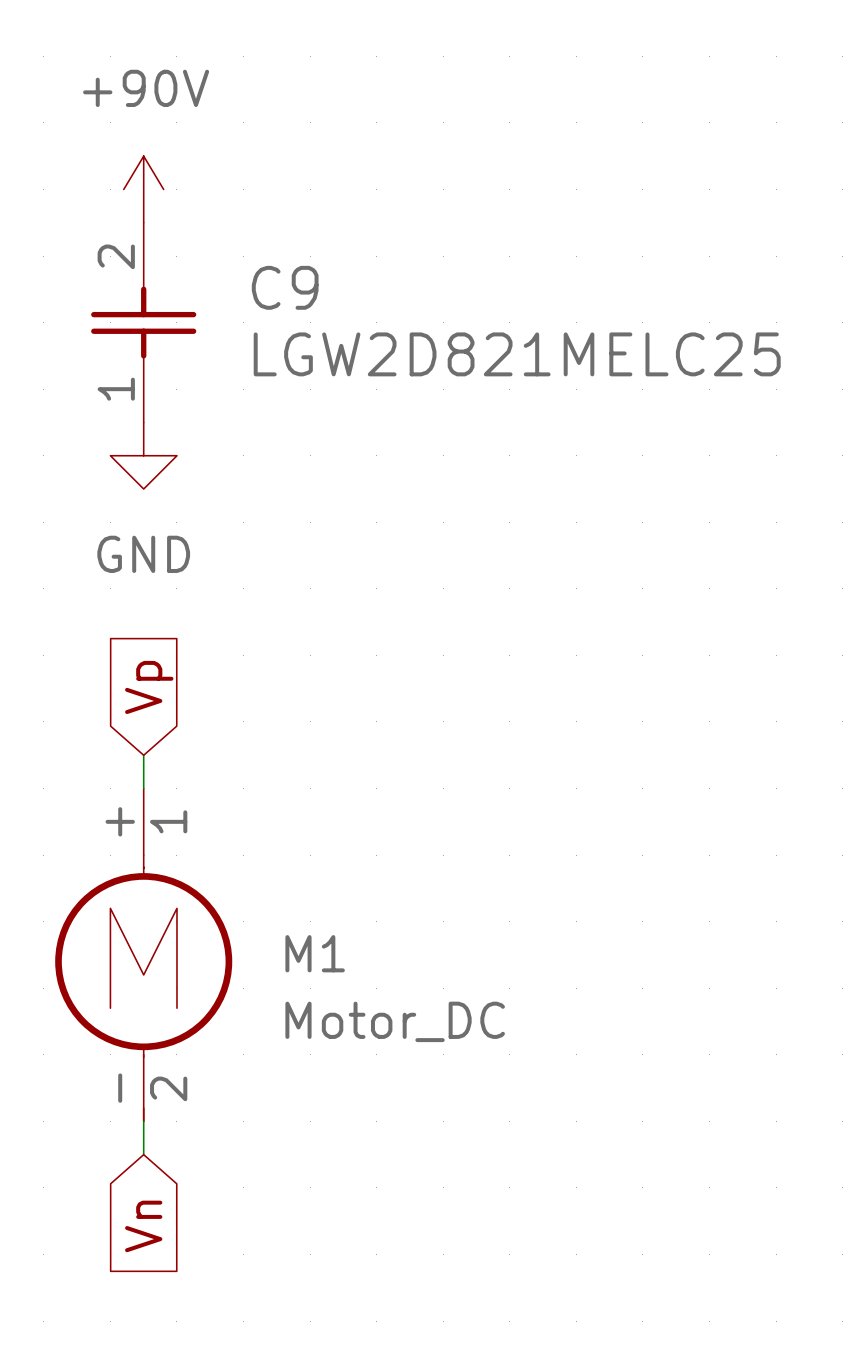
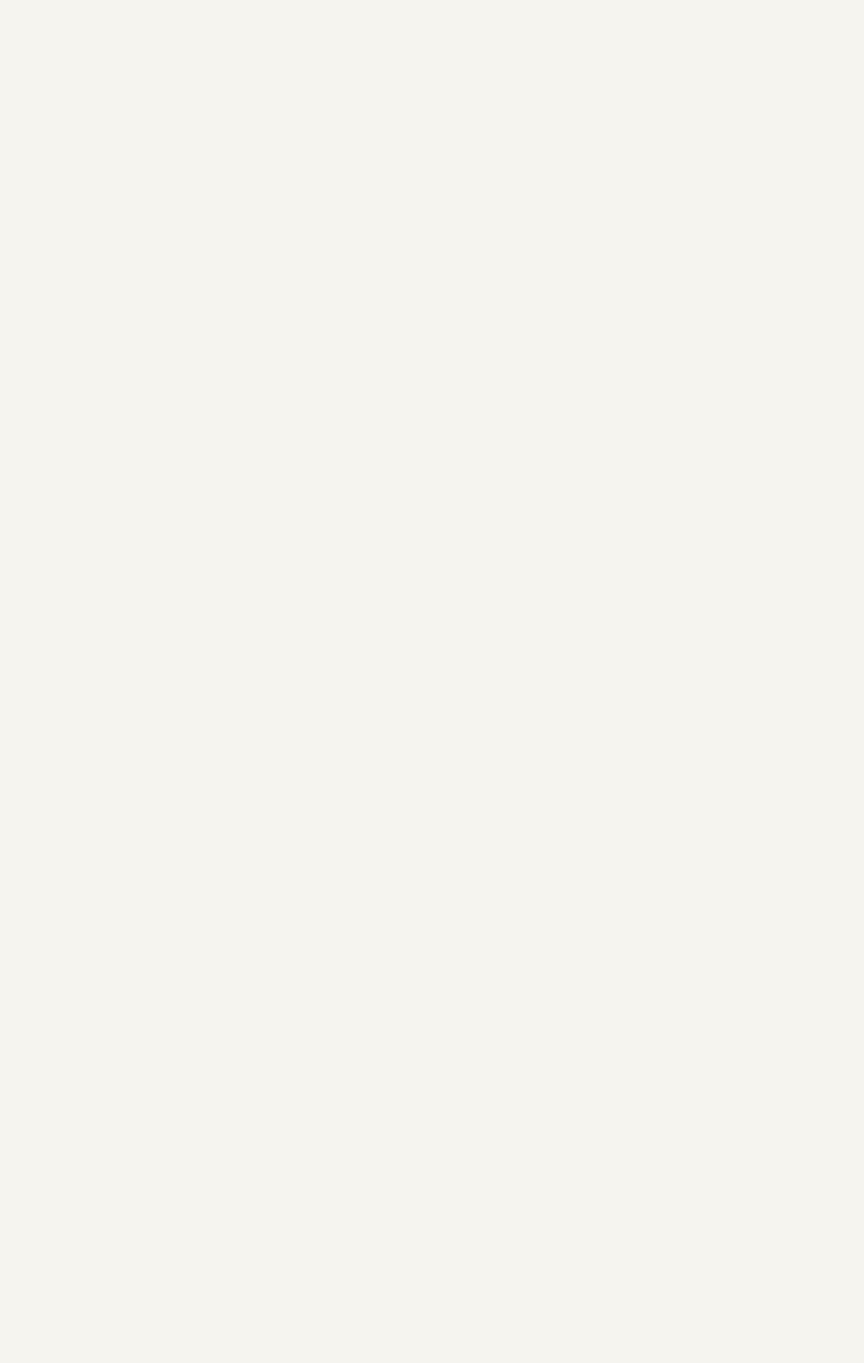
power symbol: +90V (143, 189) -> none
C9: LGW2D821MELC25 (143, 322) -> none
power symbol: GND (143, 455) -> none
global label: Vp (149, 687) -> none
wire: (143, 755) (143, 788) -> none
M1: Motor_DC (143, 954) -> none
wire: (143, 1121) (143, 1154) -> none
global label: Vn (143, 1226) -> none

